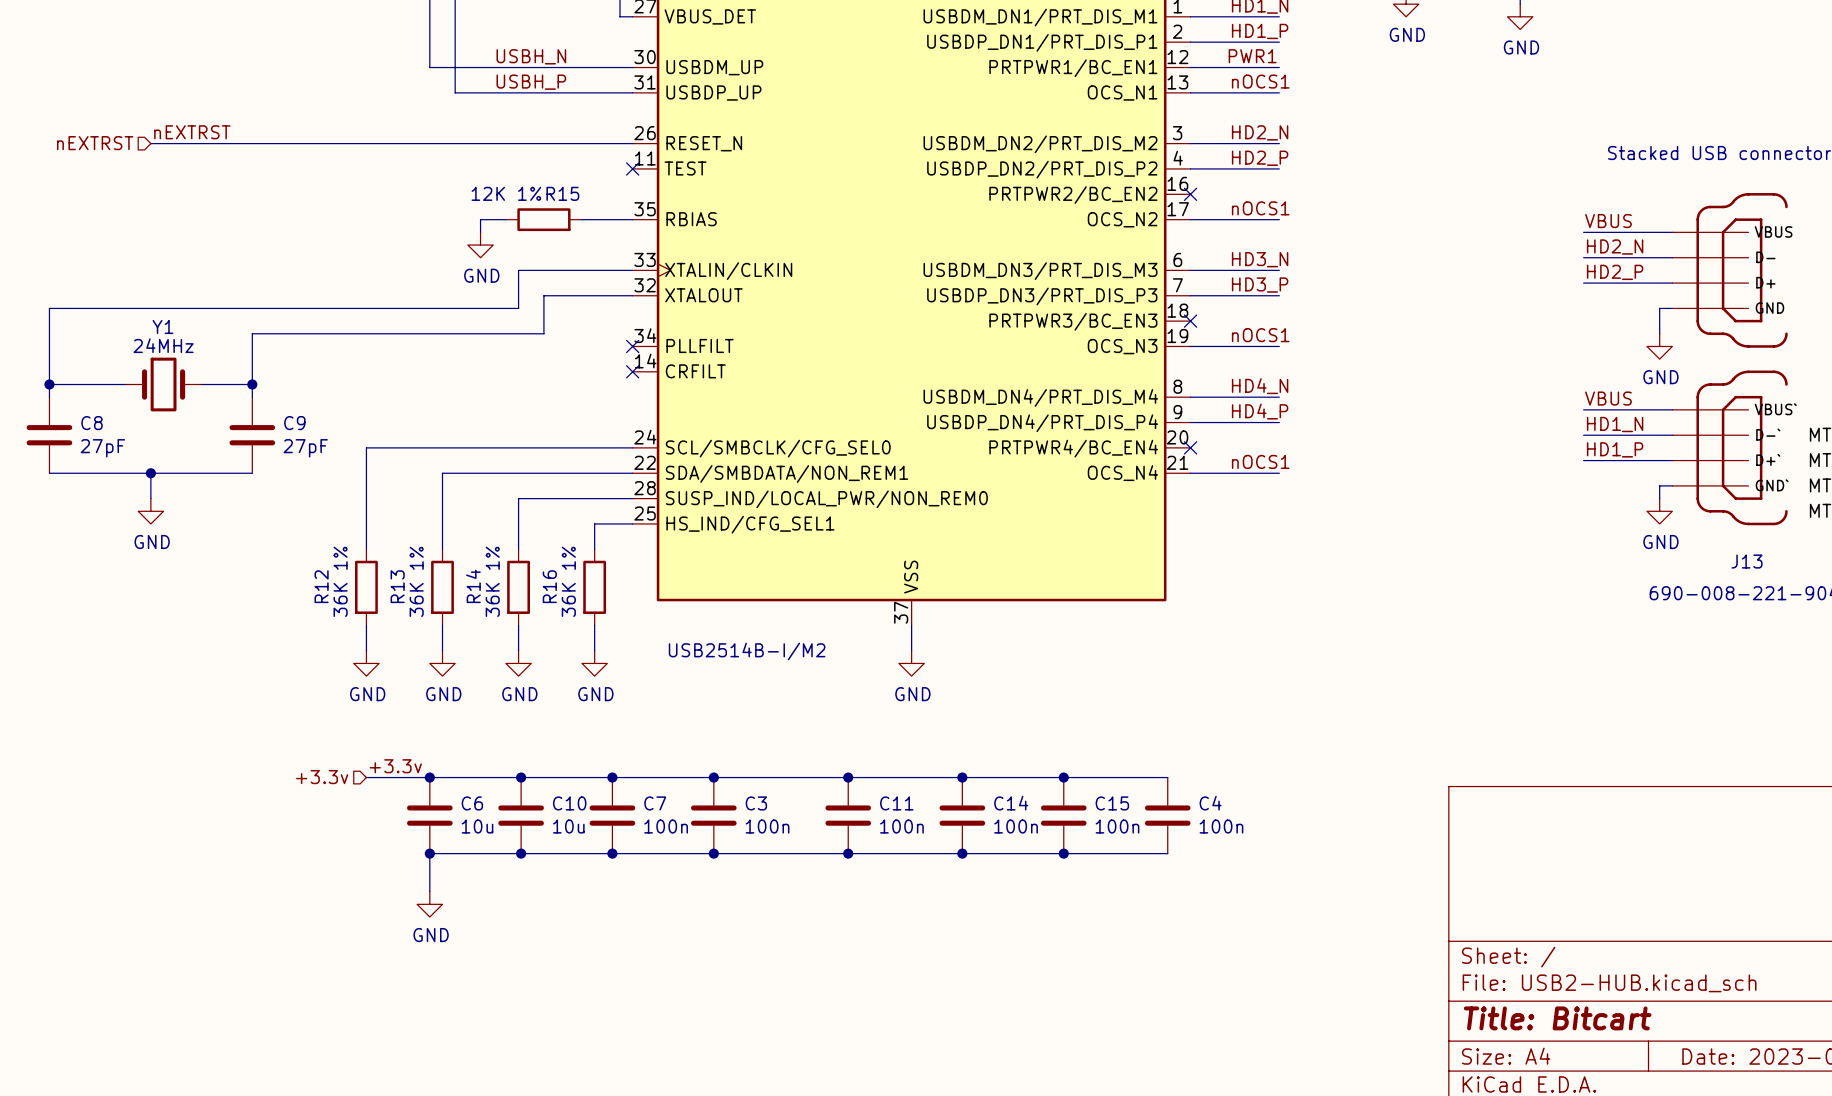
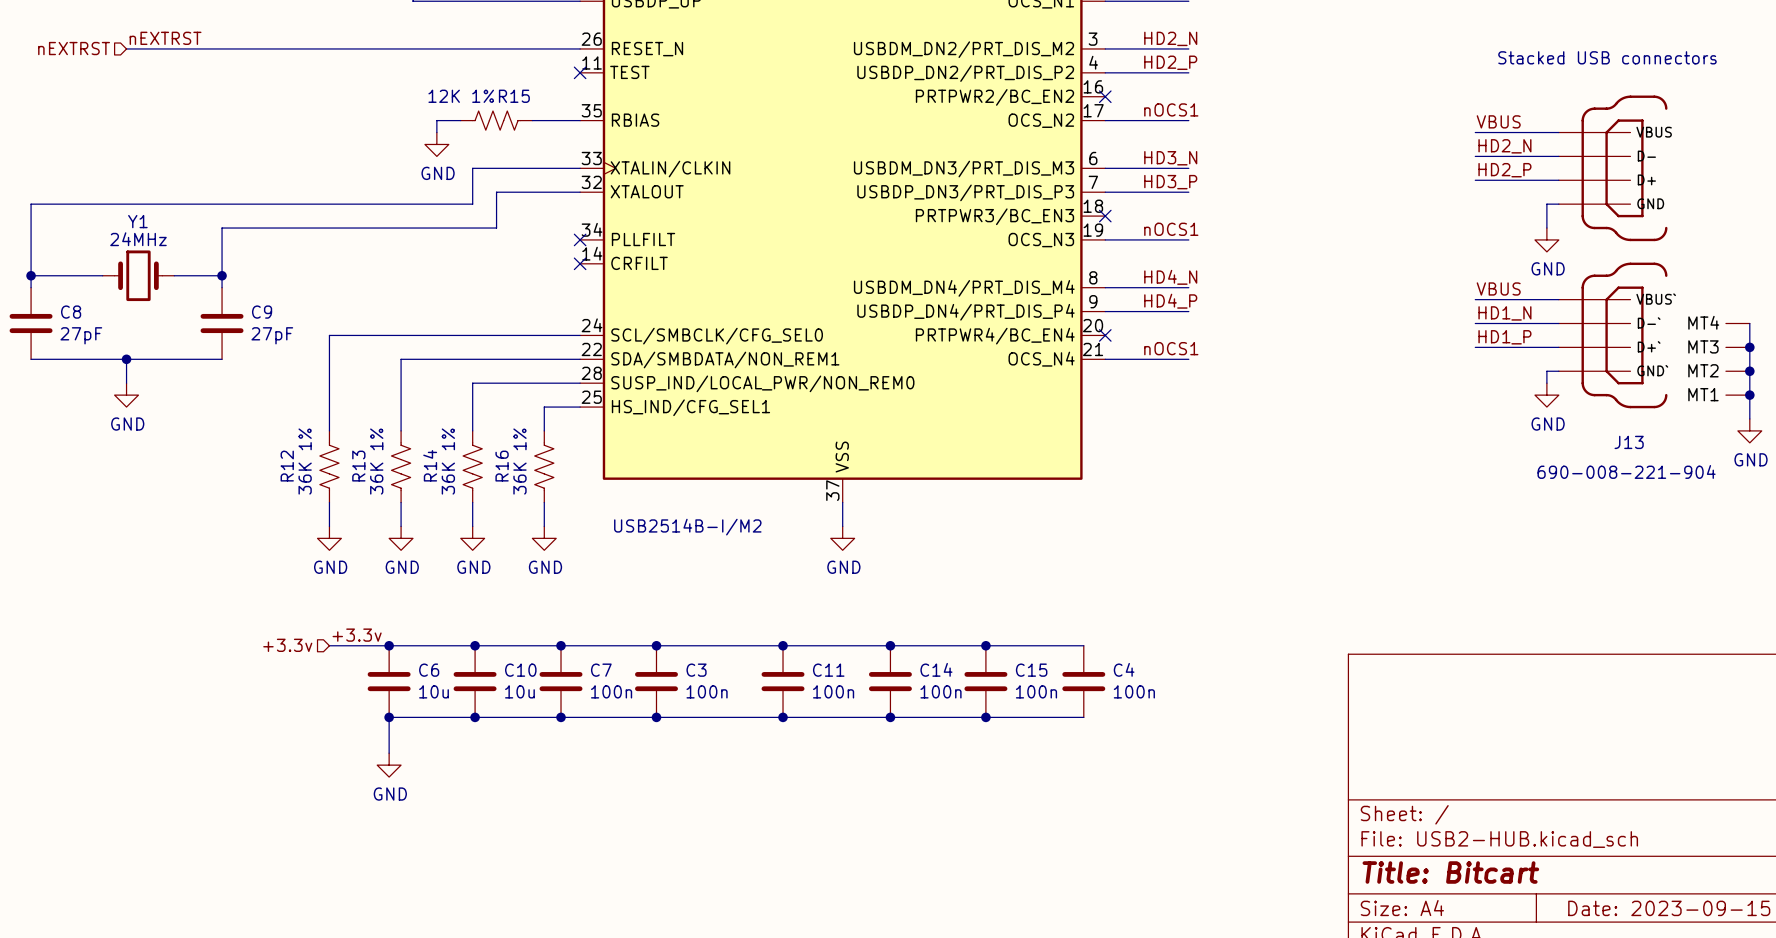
R15 symbol: [505, 208, 582, 232] -> [460, 111, 533, 131]
R12 symbol: [355, 549, 378, 626] -> [319, 430, 340, 503]
R13 symbol: [431, 549, 454, 626] -> [391, 430, 411, 503]
R14 symbol: [507, 549, 530, 626] -> [463, 430, 483, 503]
R16 symbol: [583, 549, 607, 626] -> [534, 430, 554, 503]

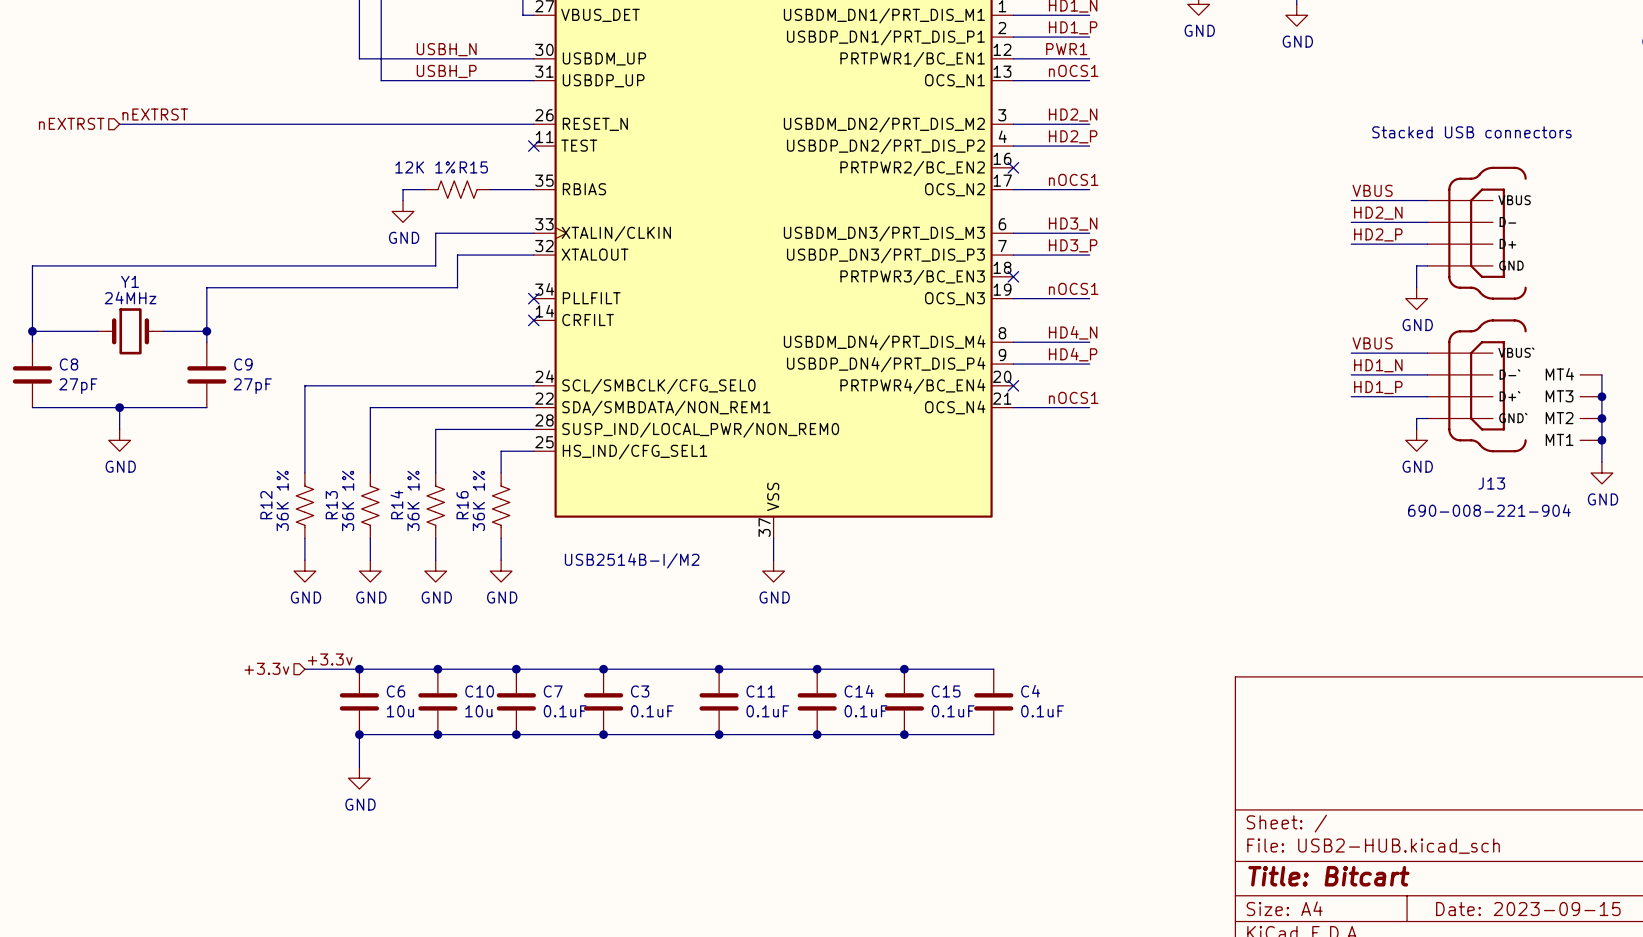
C7 value: 100n (611, 691) -> 0.1uF (565, 711)
C3 value: 100n (707, 691) -> 0.1uF (652, 711)
C11 value: 100n (833, 691) -> 0.1uF (767, 711)
C14 value: 100n (940, 691) -> 0.1uF (865, 711)
C15 value: 100n (1036, 691) -> 0.1uF (953, 711)
C4 value: 100n (1134, 691) -> 0.1uF (1042, 711)

